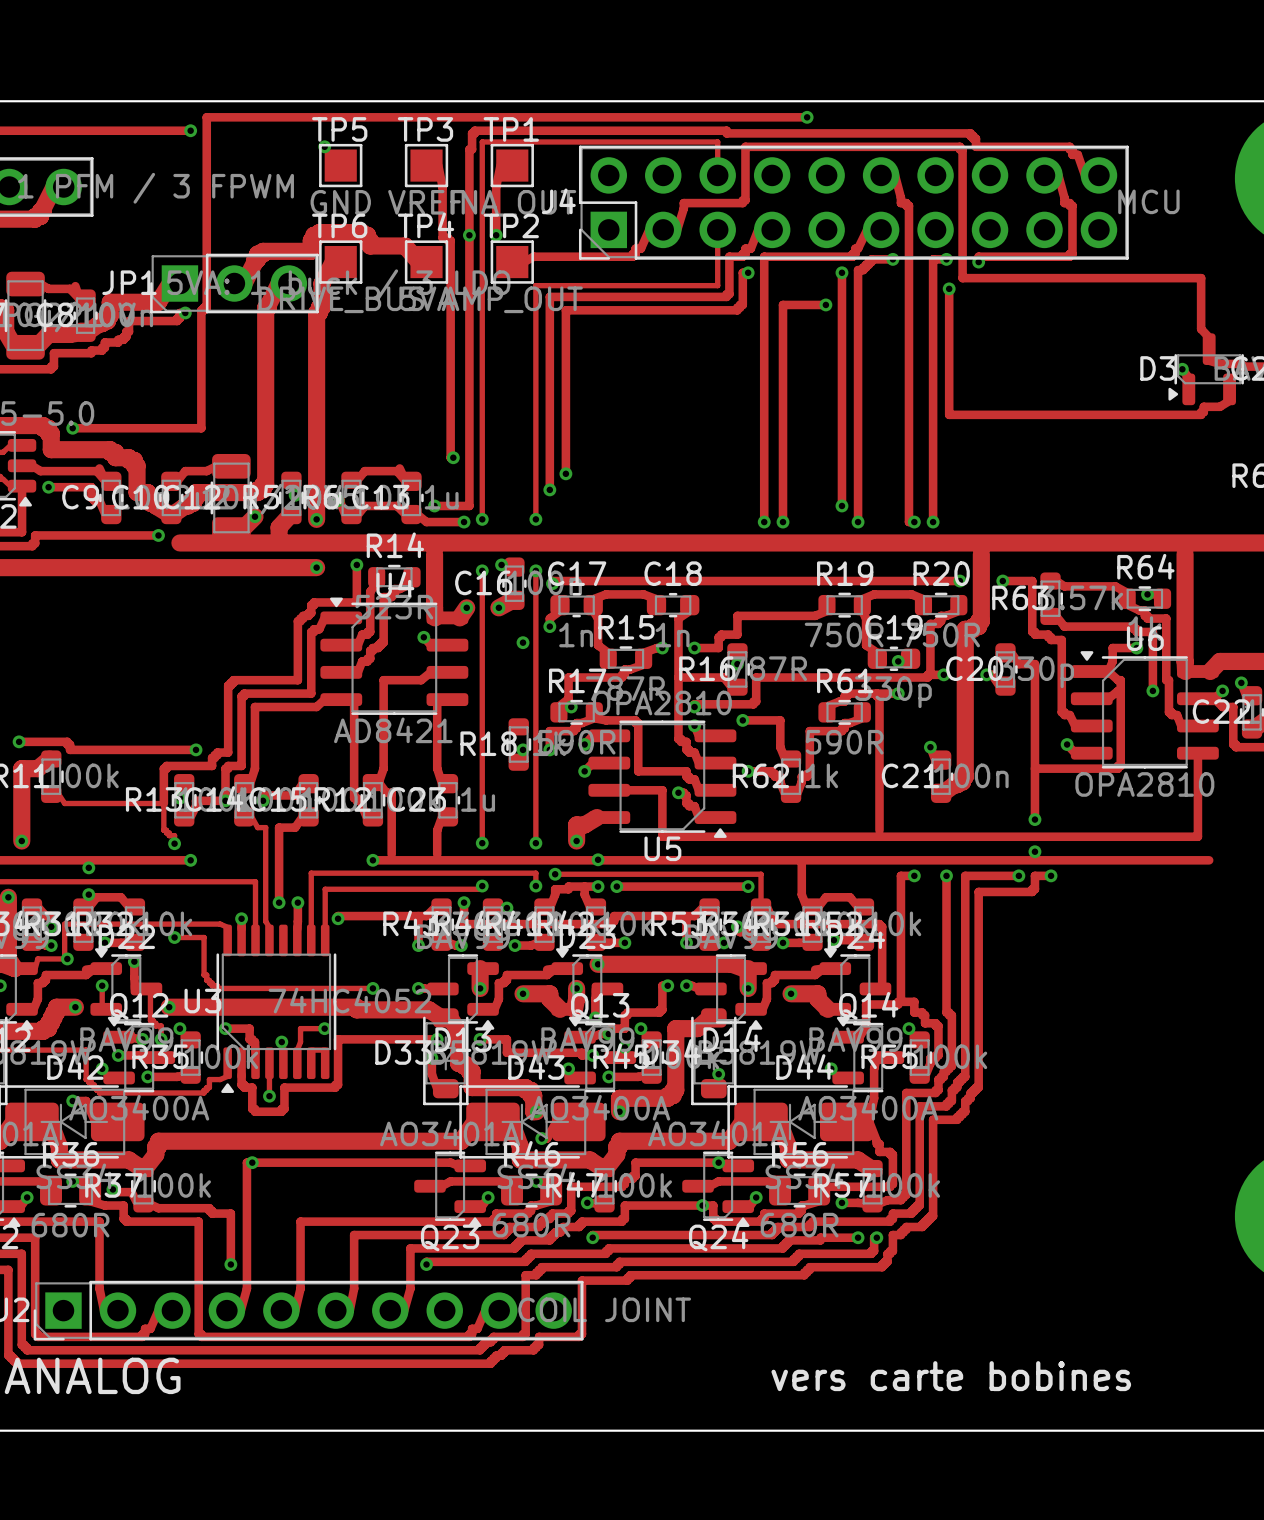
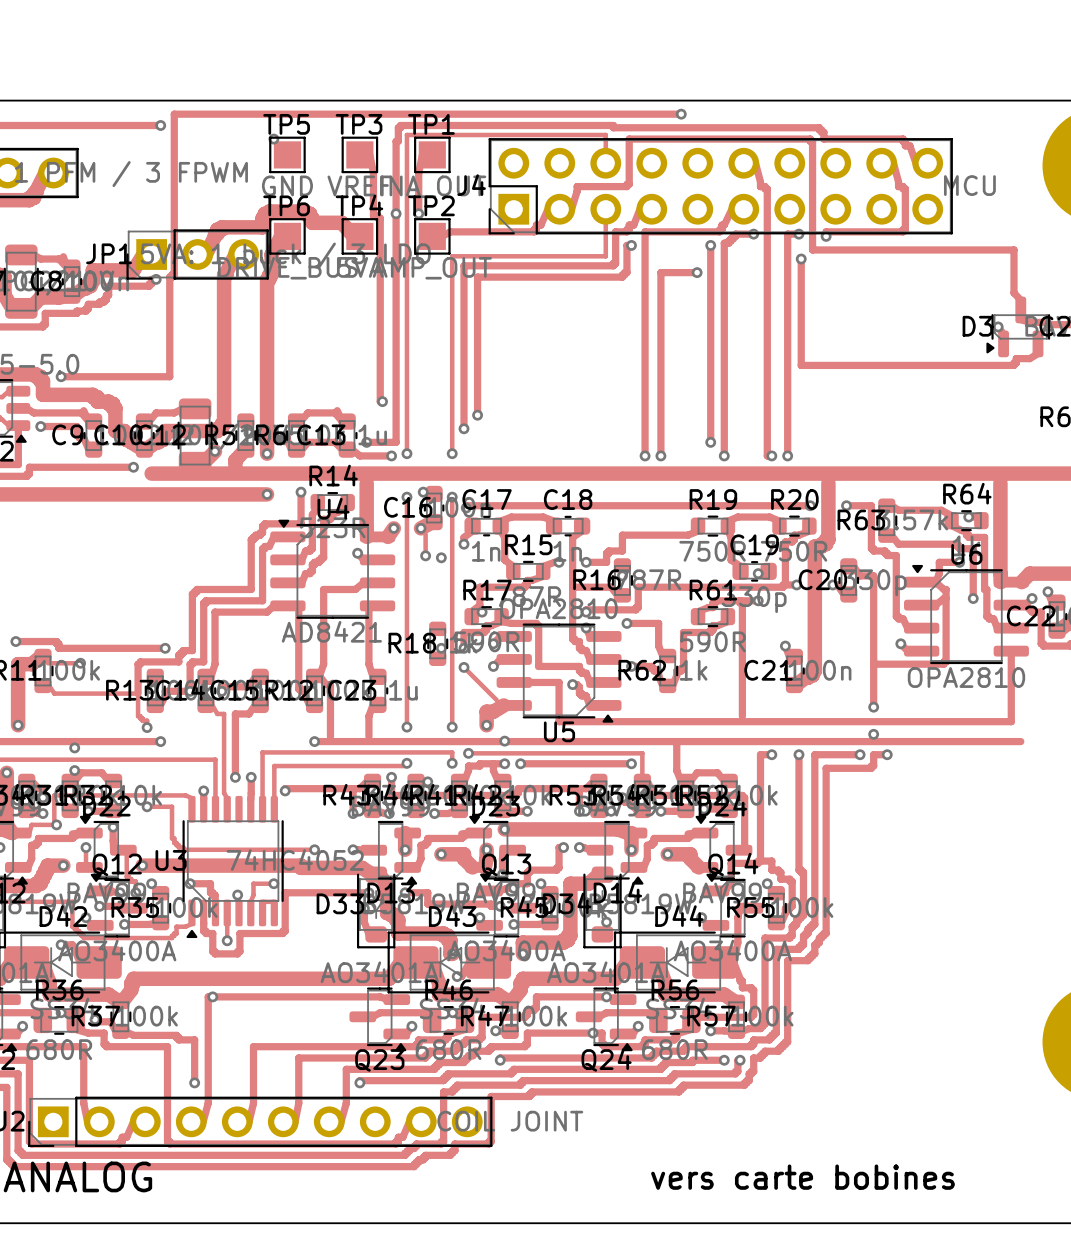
track: none -> (425, 534) (425, 555)
via: none -> (425, 555)
track: none -> (47, 663) (80, 663)
via: none -> (80, 663)
track: none -> (464, 667) (496, 700)
via: none -> (464, 667)

